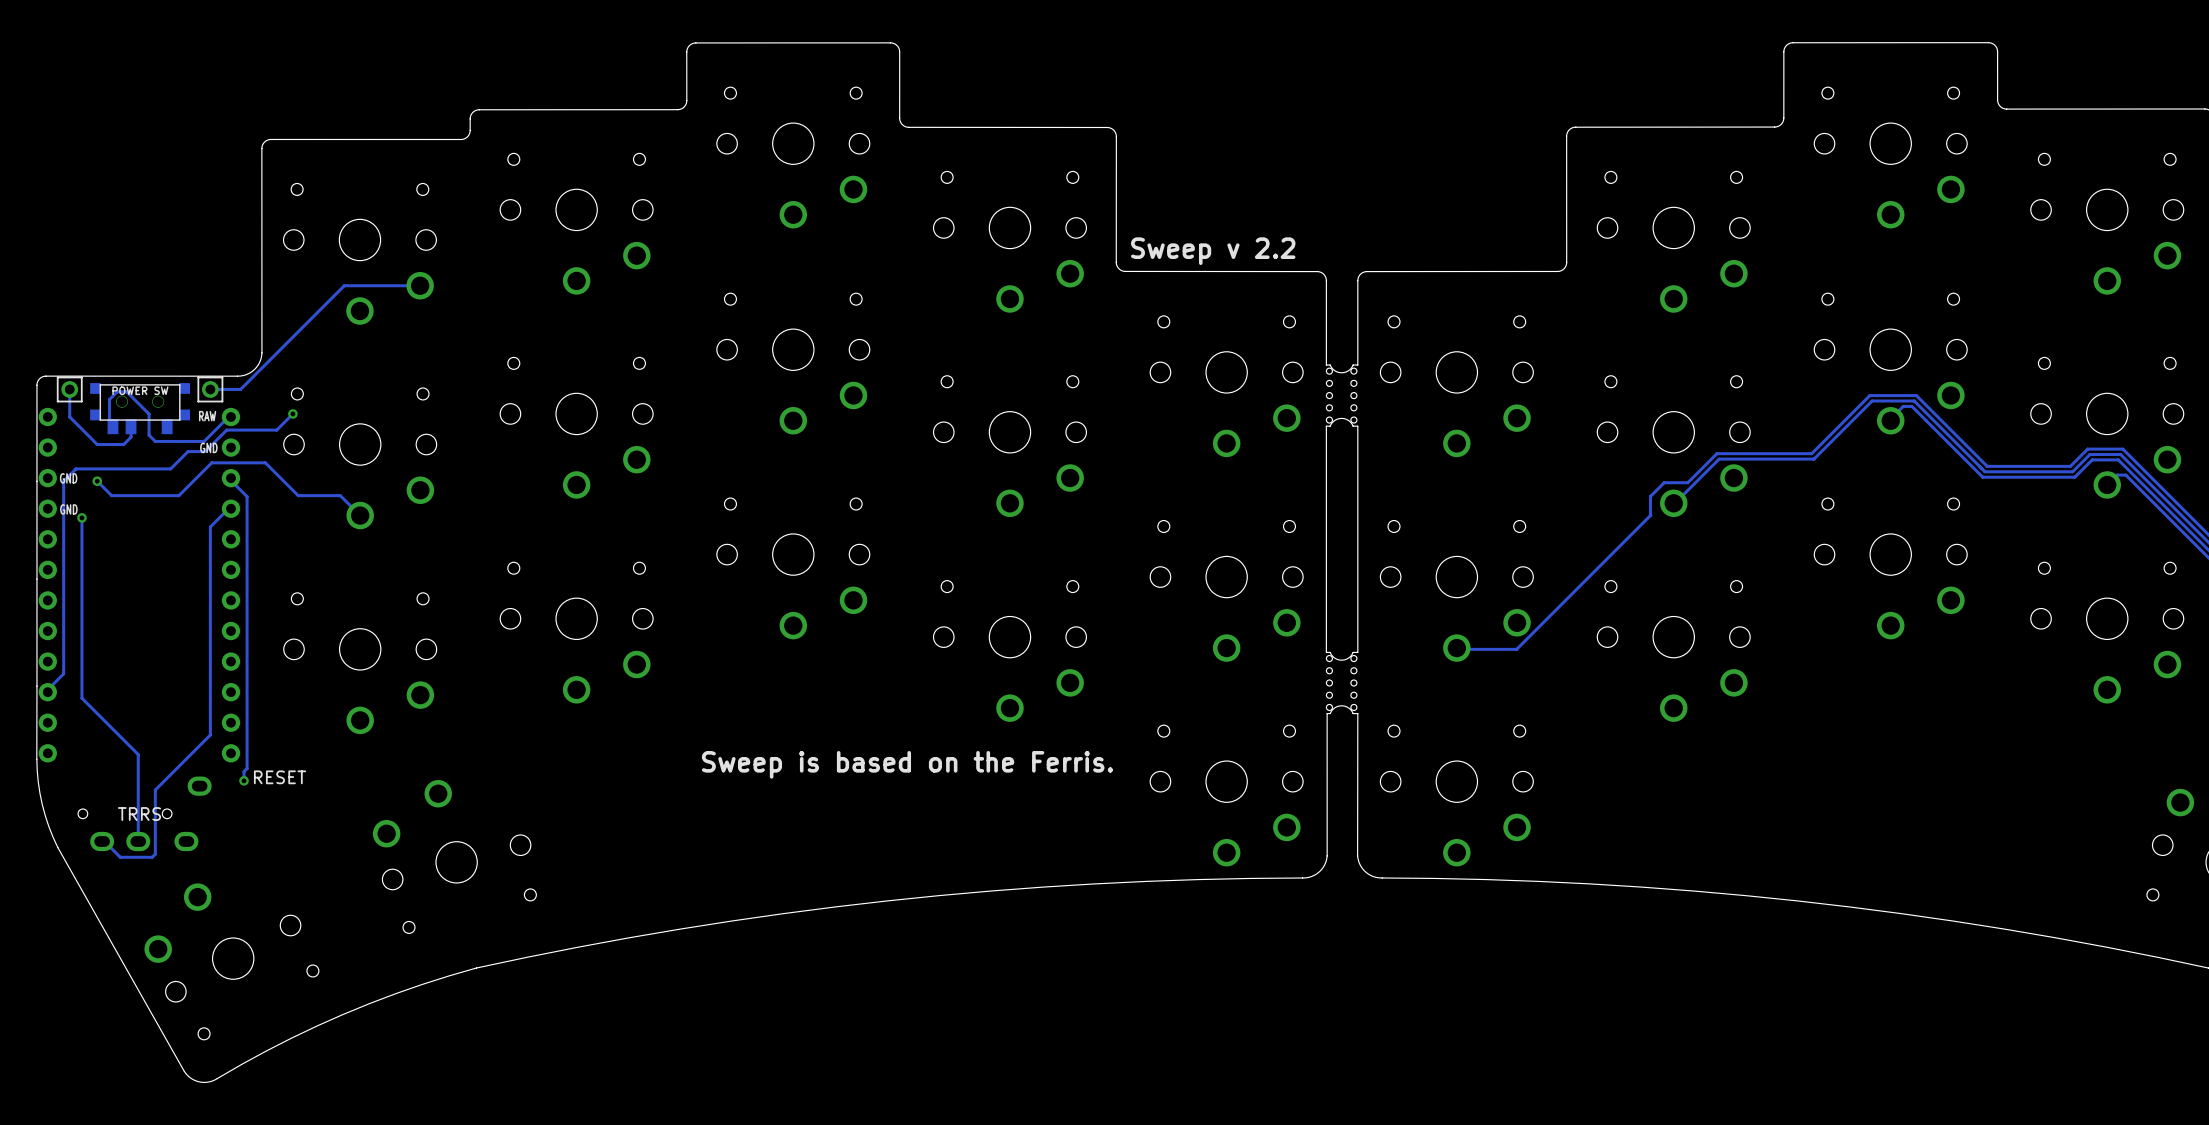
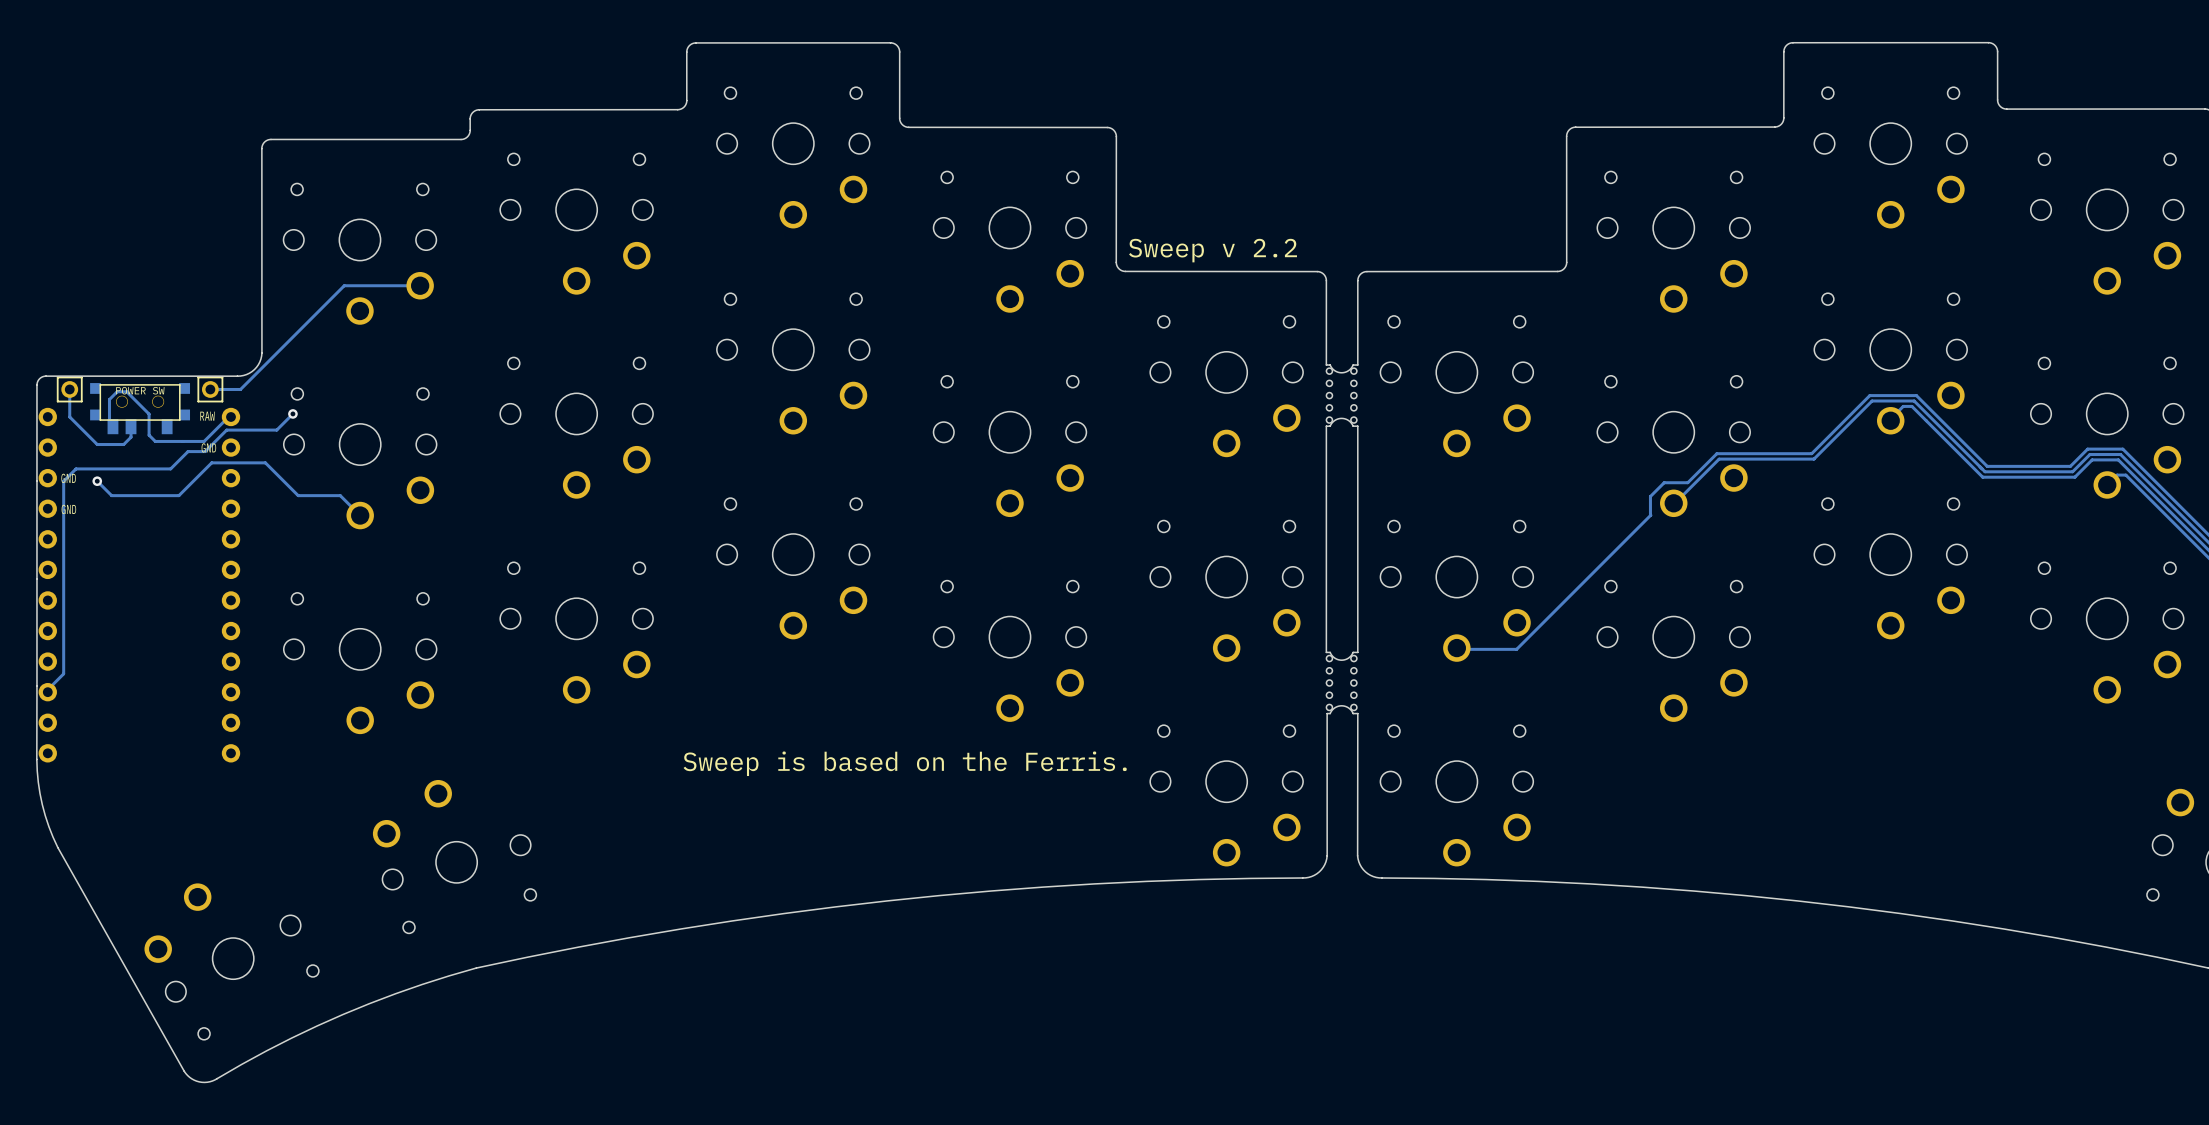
track: (228, 478) (247, 496) (247, 768) (244, 771) (244, 780) -> none
track: (228, 508) (210, 526) (210, 734) (155, 790) (155, 854) (152, 857) (120, 857) (102, 839) -> none
track: (81, 517) (81, 698) (138, 754) (138, 839) -> none
via: (81, 517) -> none
part: (280, 777) -> none
via: (244, 780) -> none
part: (144, 813) -> none

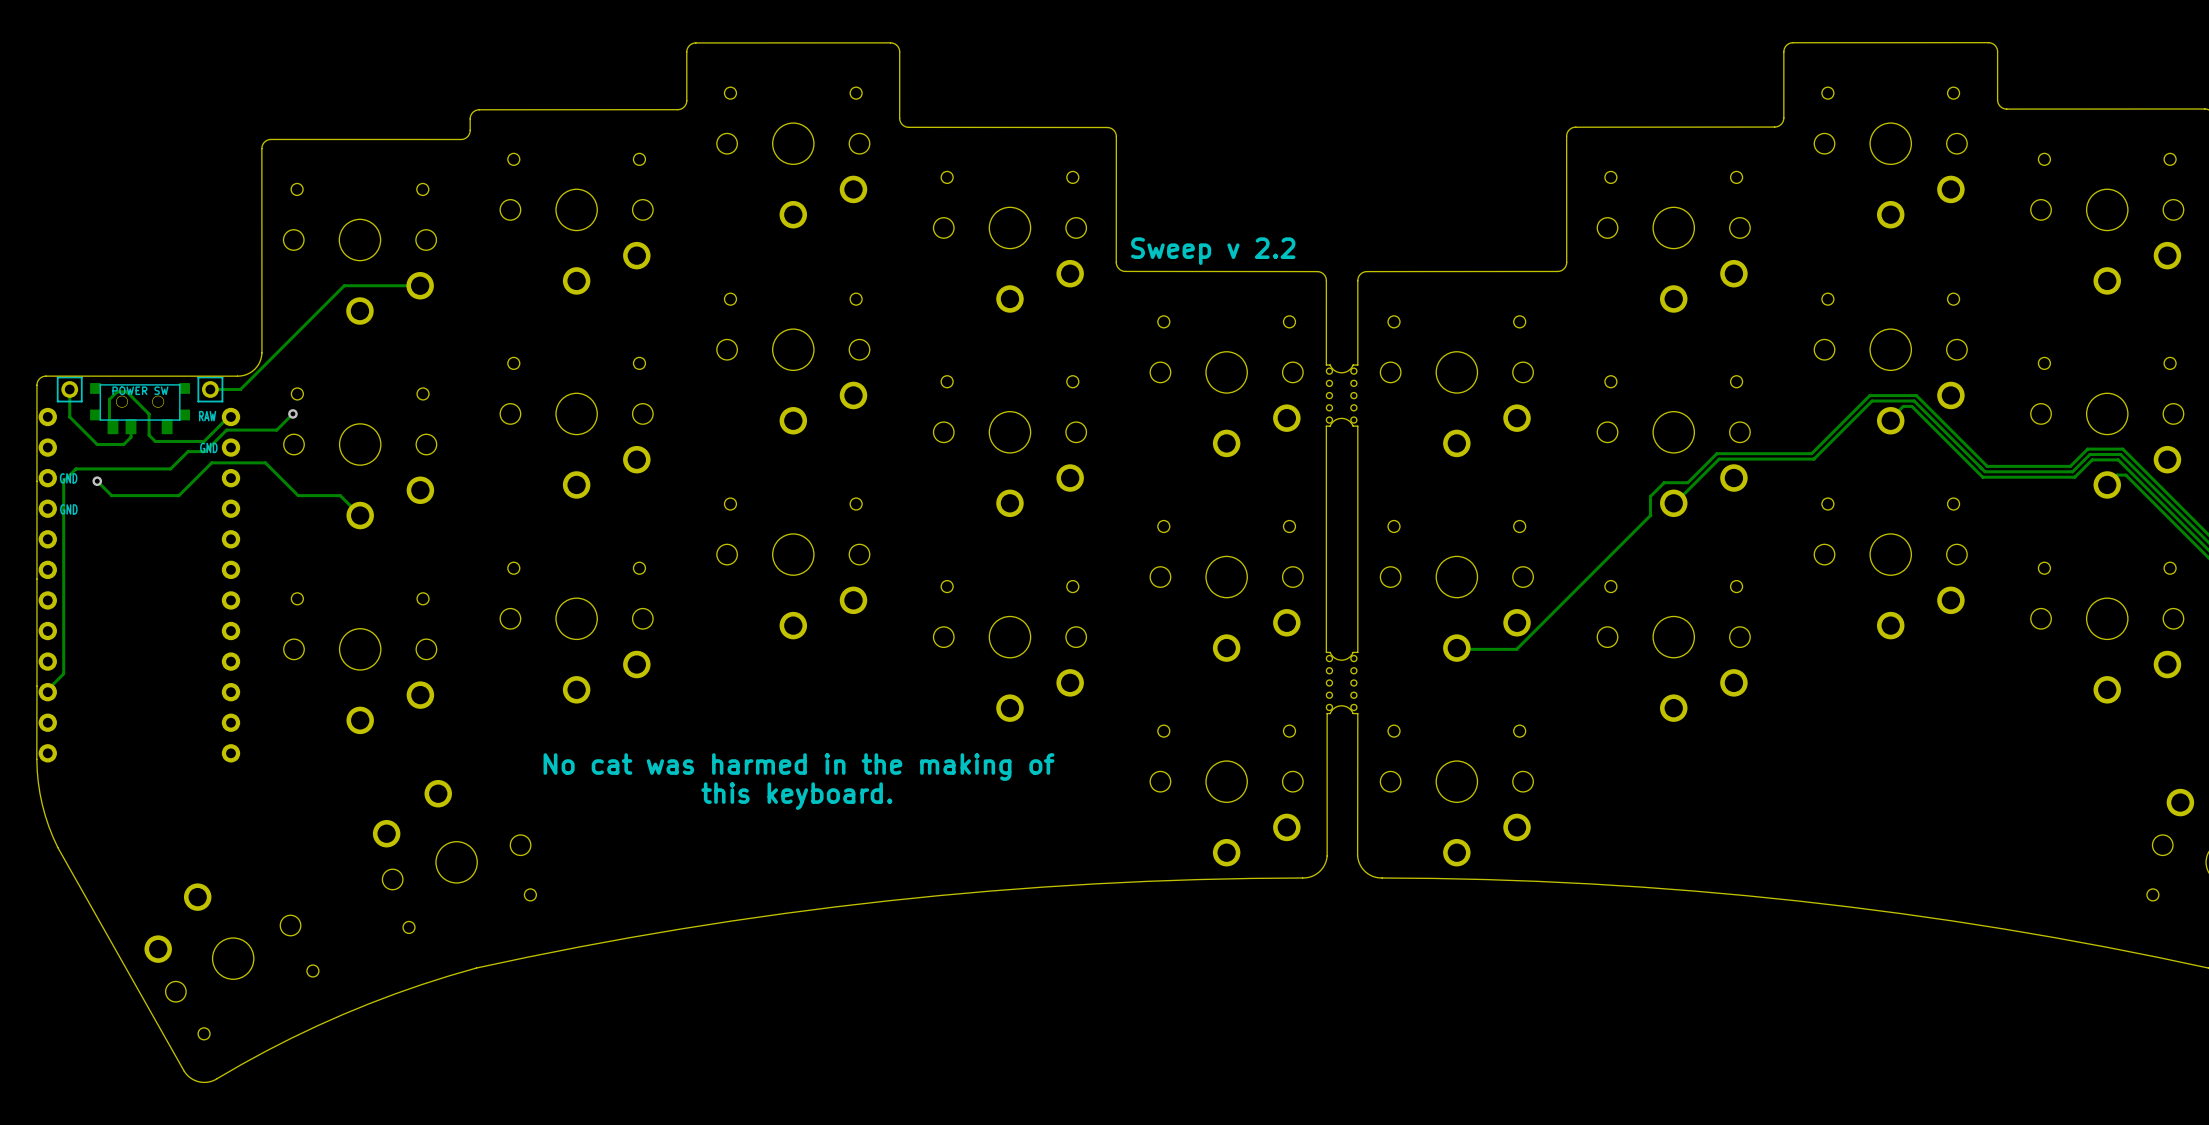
text: Sweep is based on the Ferris. (905, 763) -> none
text: none -> No cat was harmed in the making of (798, 767)
text: none -> this keyboard. (796, 796)

